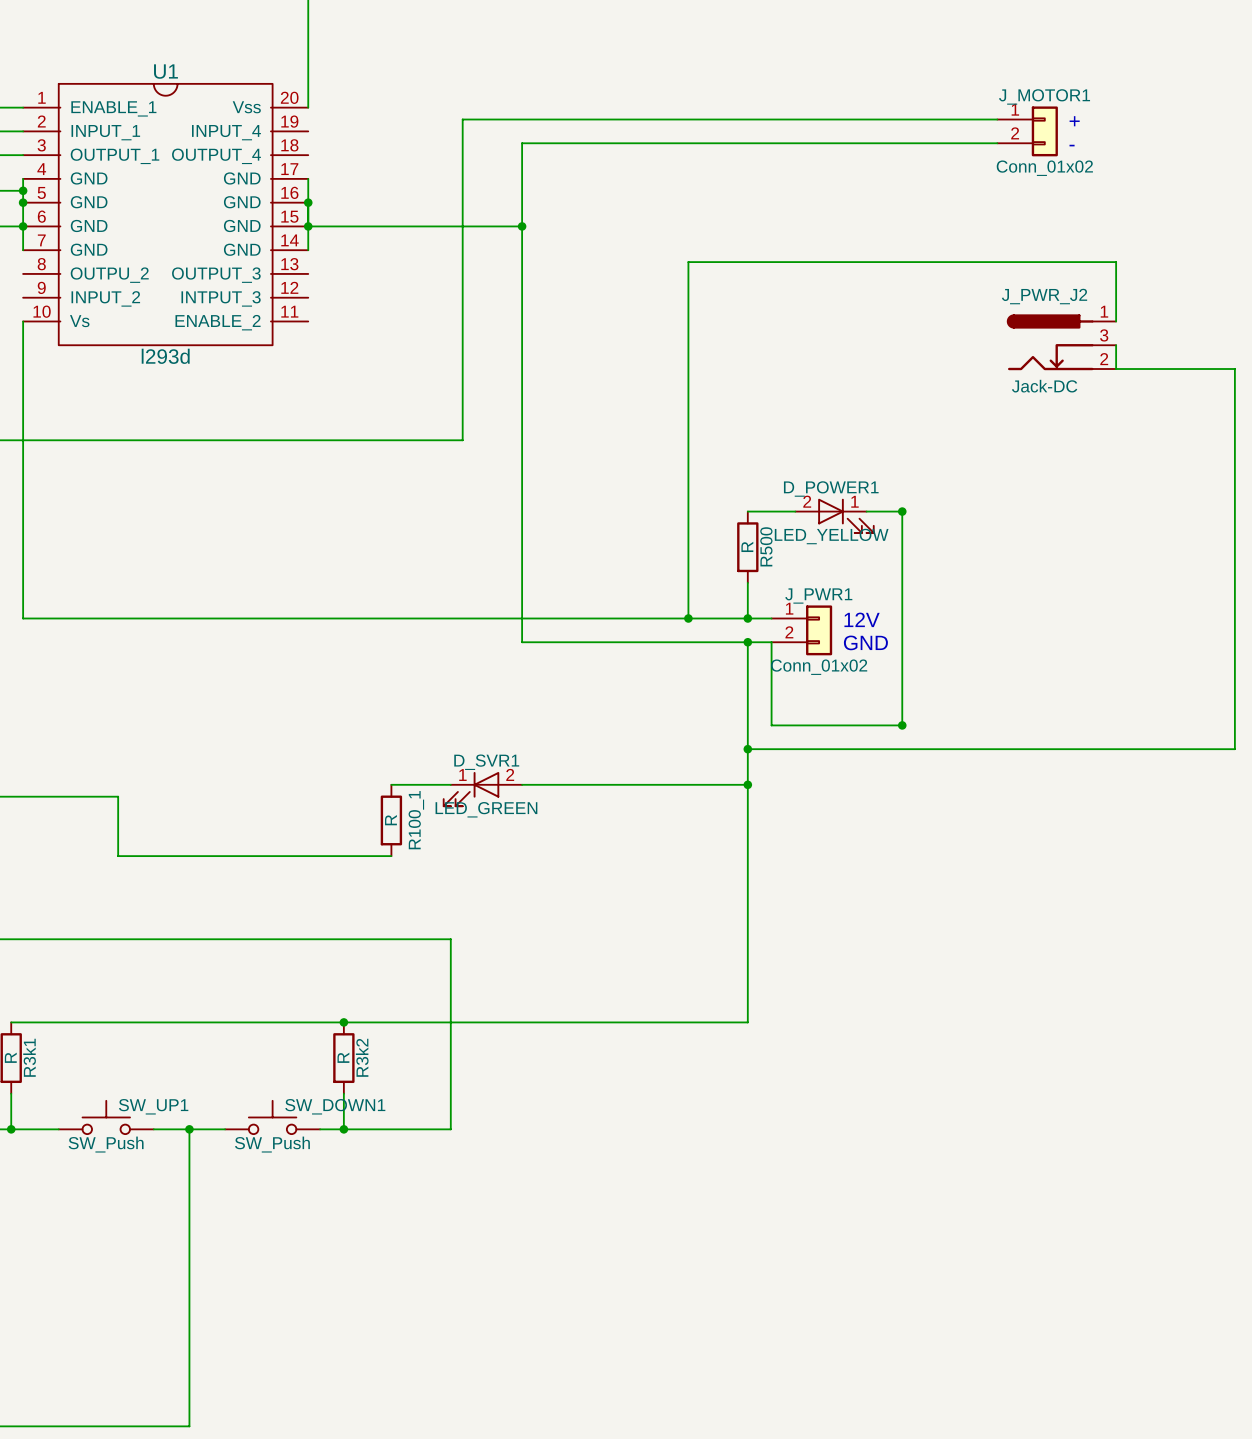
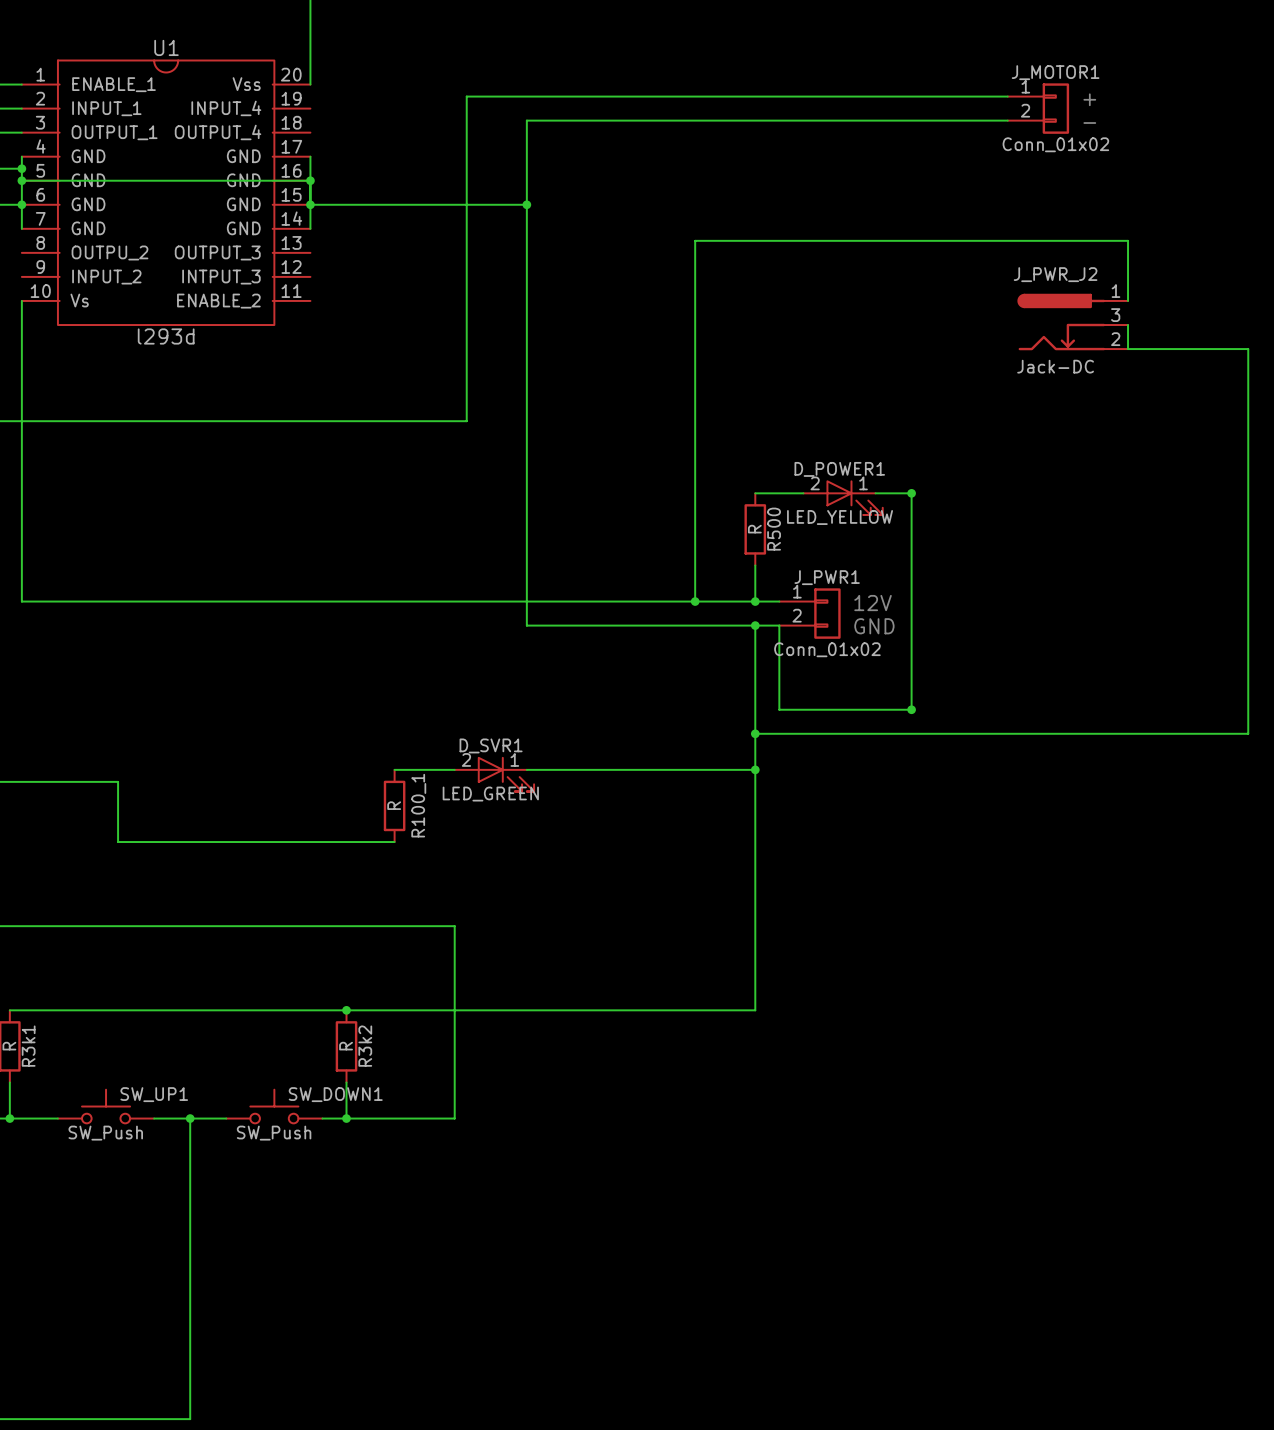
wire: none -> (21, 180) (310, 180)
D_SVR1 flip: as is (471, 789) -> left-right (505, 774)

